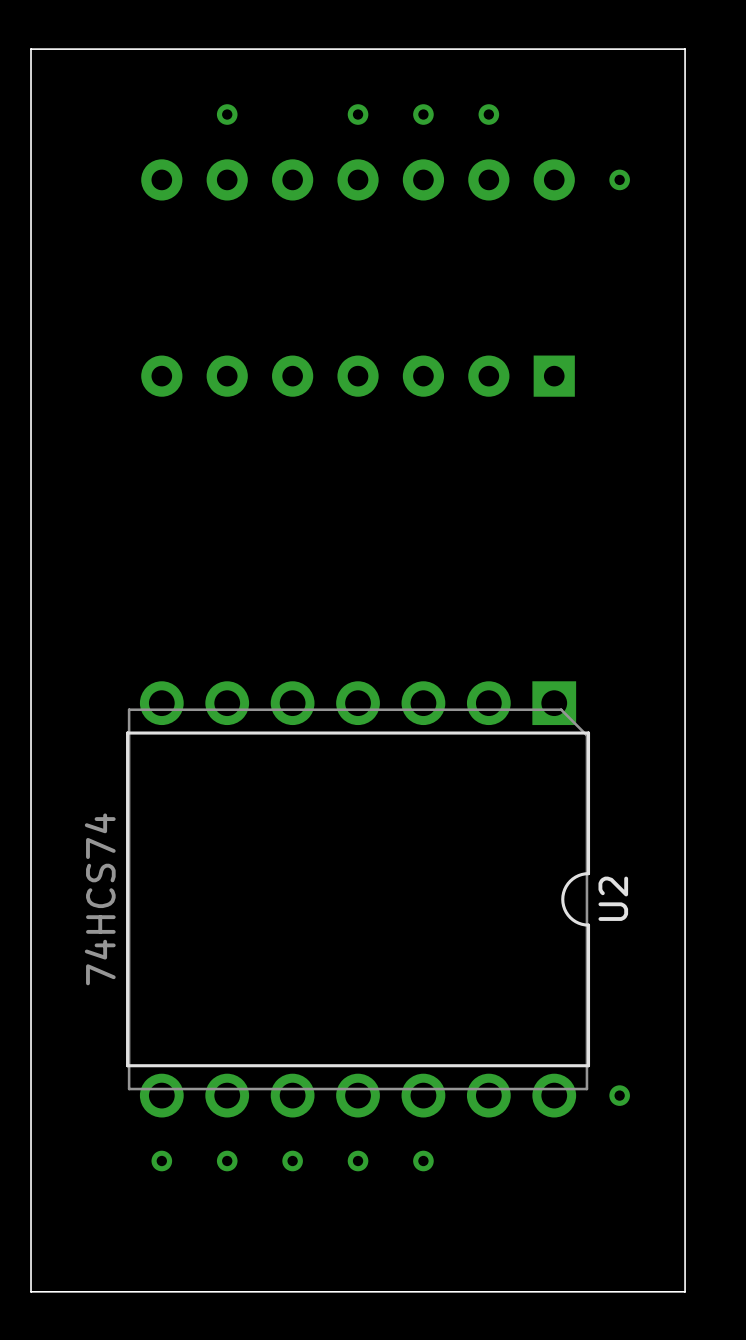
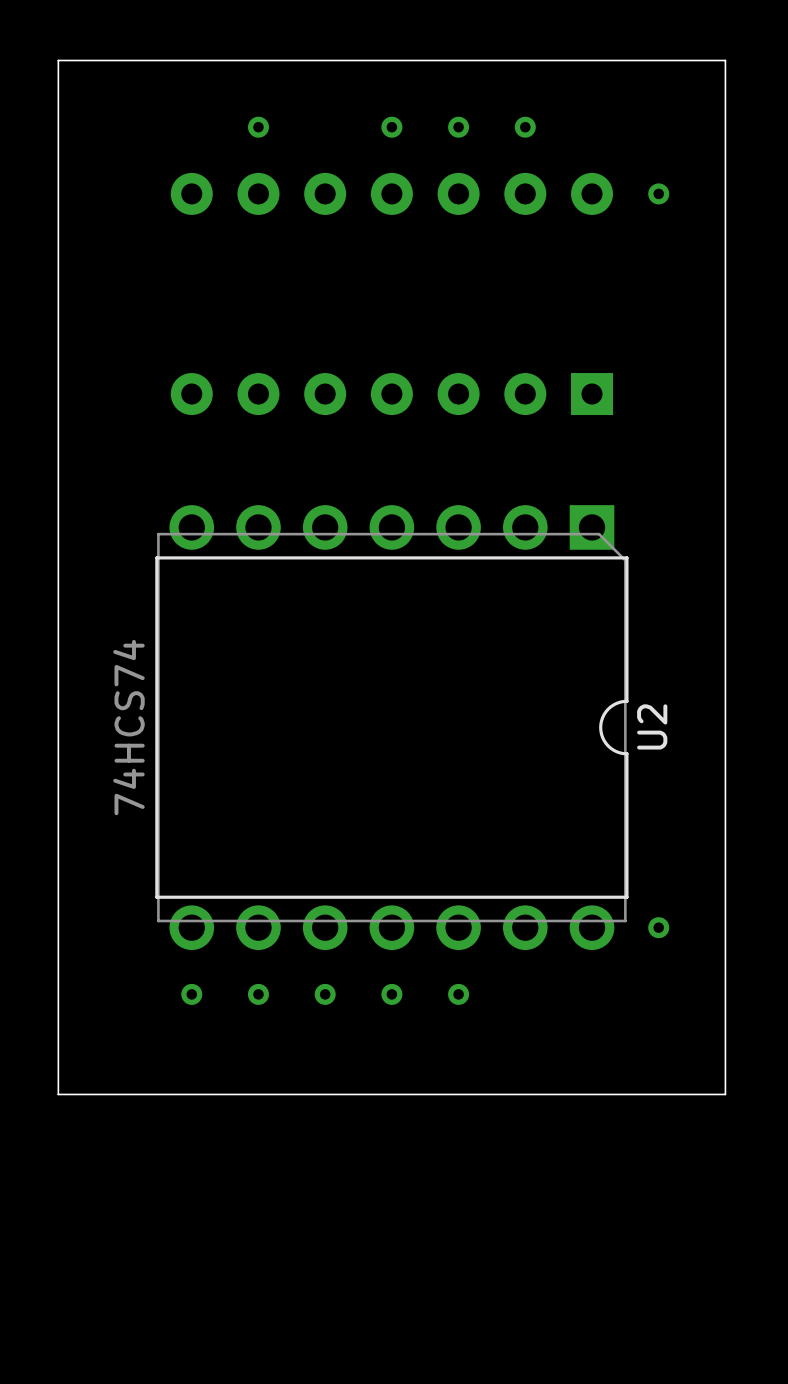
U2 position: (358, 899) -> (391, 727)
via: none -> (658, 927)
via: none -> (191, 994)
via: none -> (258, 994)
via: none -> (325, 994)
via: none -> (391, 994)
via: none -> (458, 994)
board edge: (31, 1062) (31, 1291) (685, 1291) (685, 1062) -> (58, 1094) (725, 1094)
via: (619, 1095) -> none
via: (161, 1161) -> none
via: (227, 1161) -> none
via: (292, 1161) -> none
via: (358, 1161) -> none
via: (423, 1161) -> none

